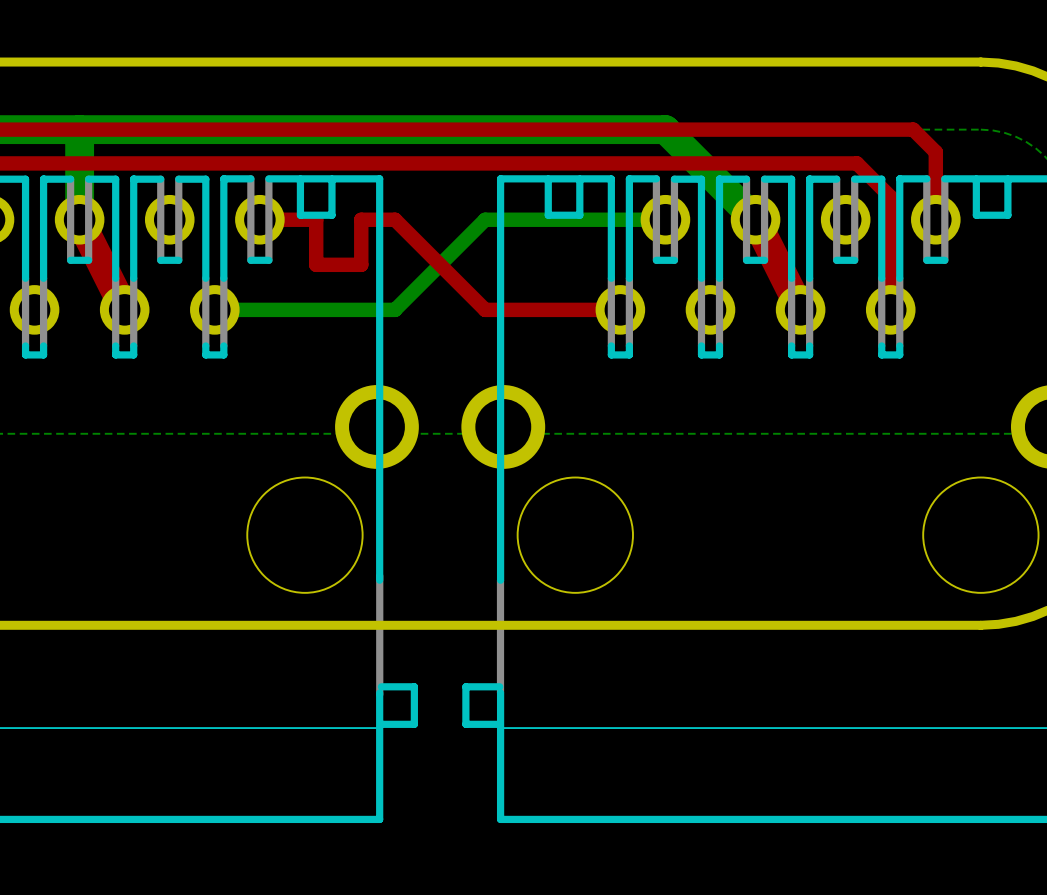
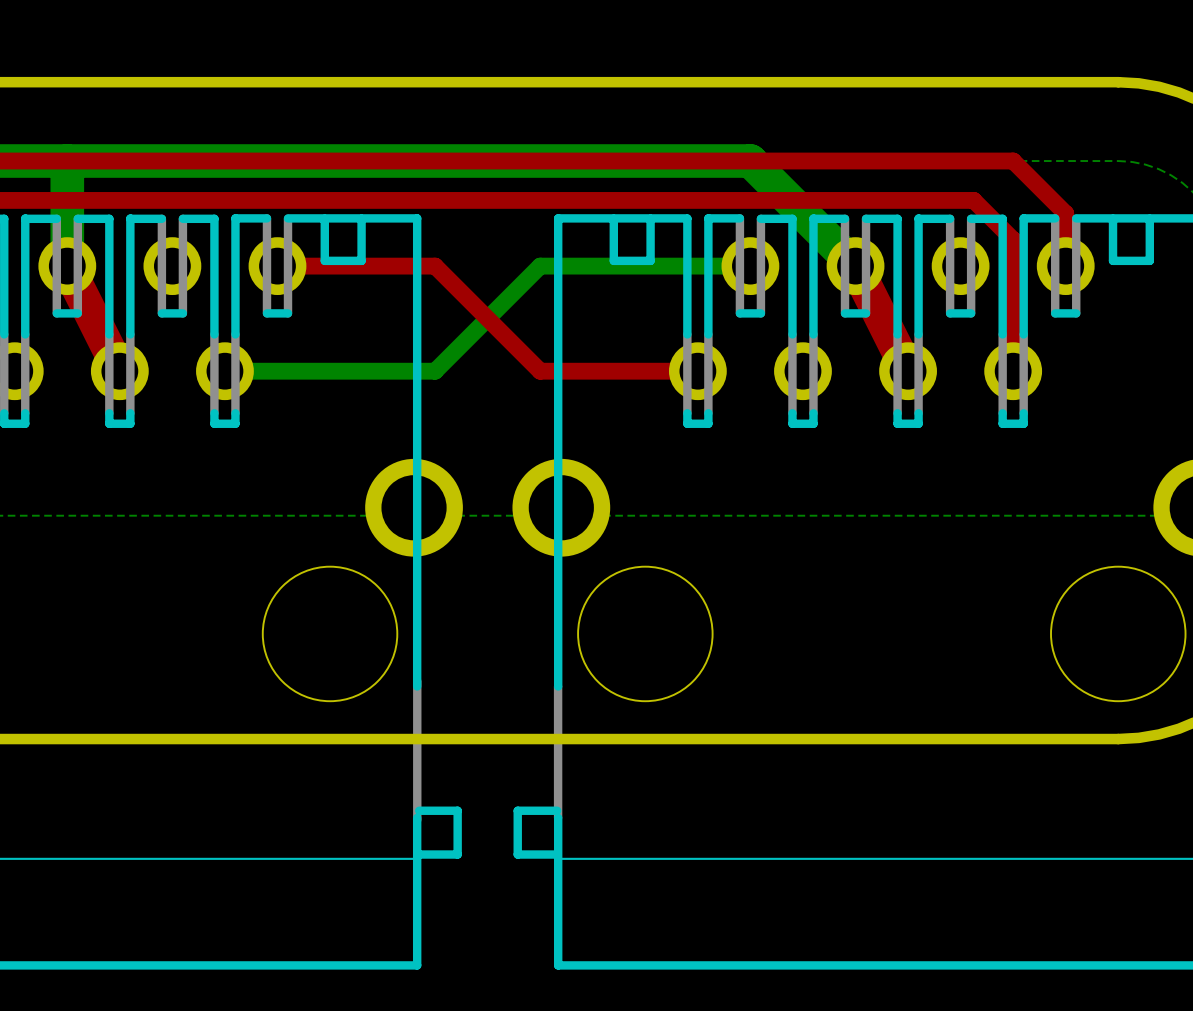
top track: (890, 129) (913, 129) (935, 152) (935, 174) -> (1013, 161) (1065, 213)
top track: (316, 219) (316, 264) (361, 264) (361, 219) -> (343, 266) (395, 266)

